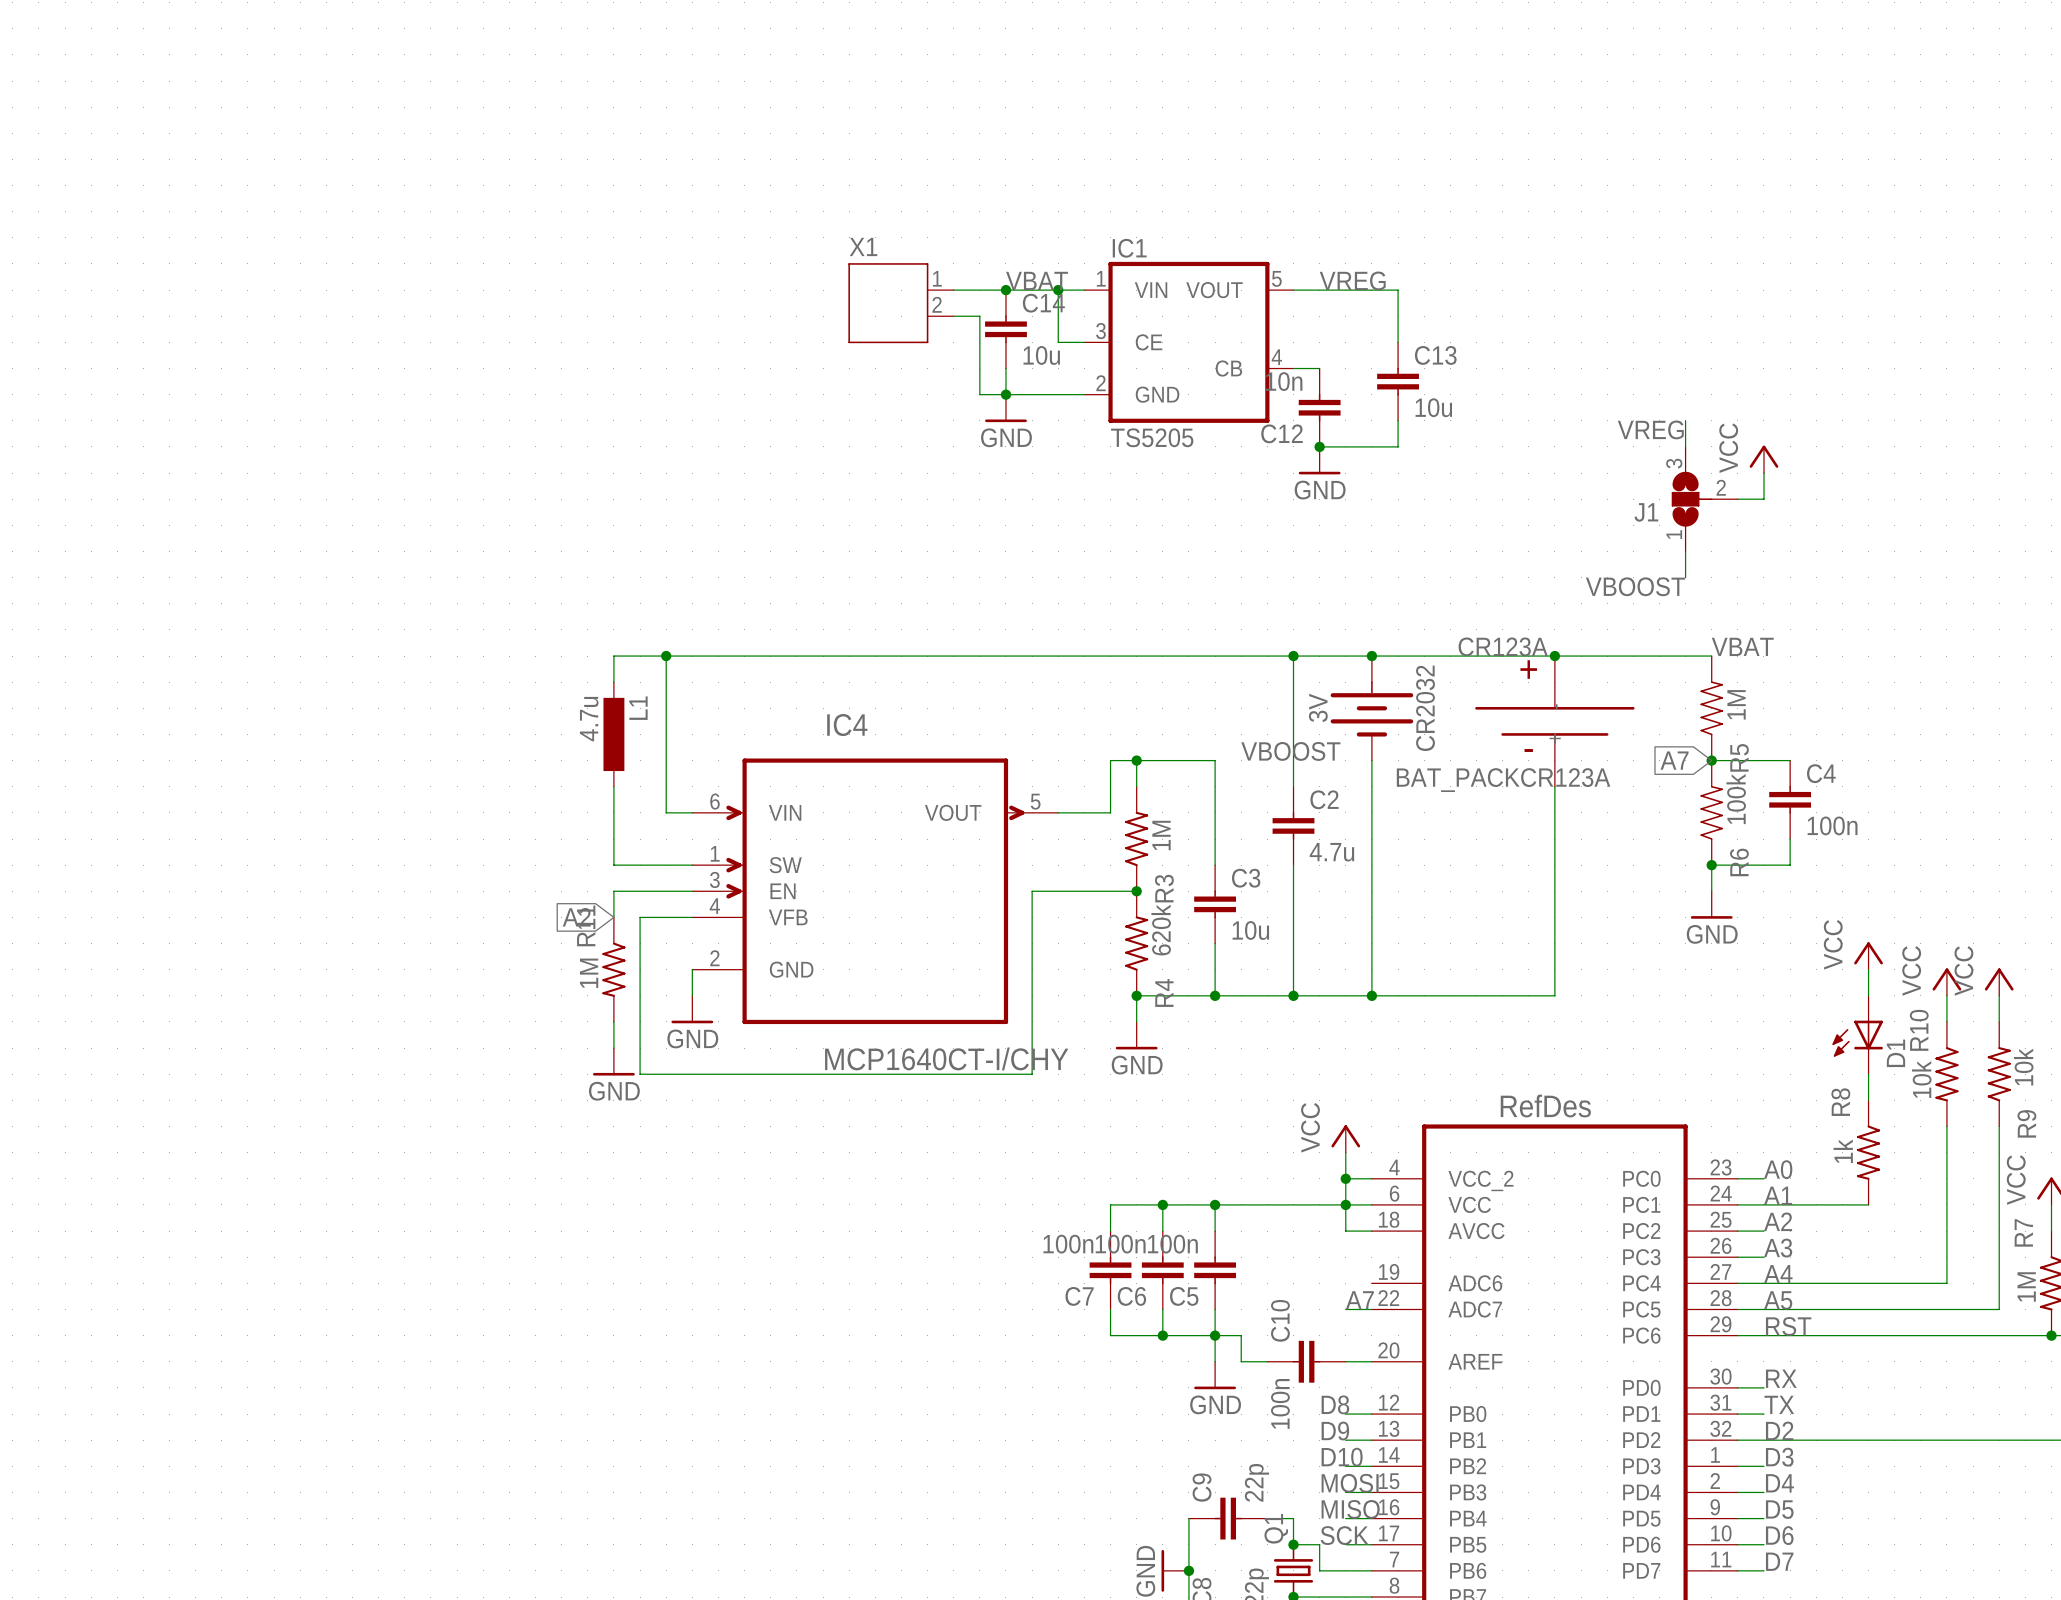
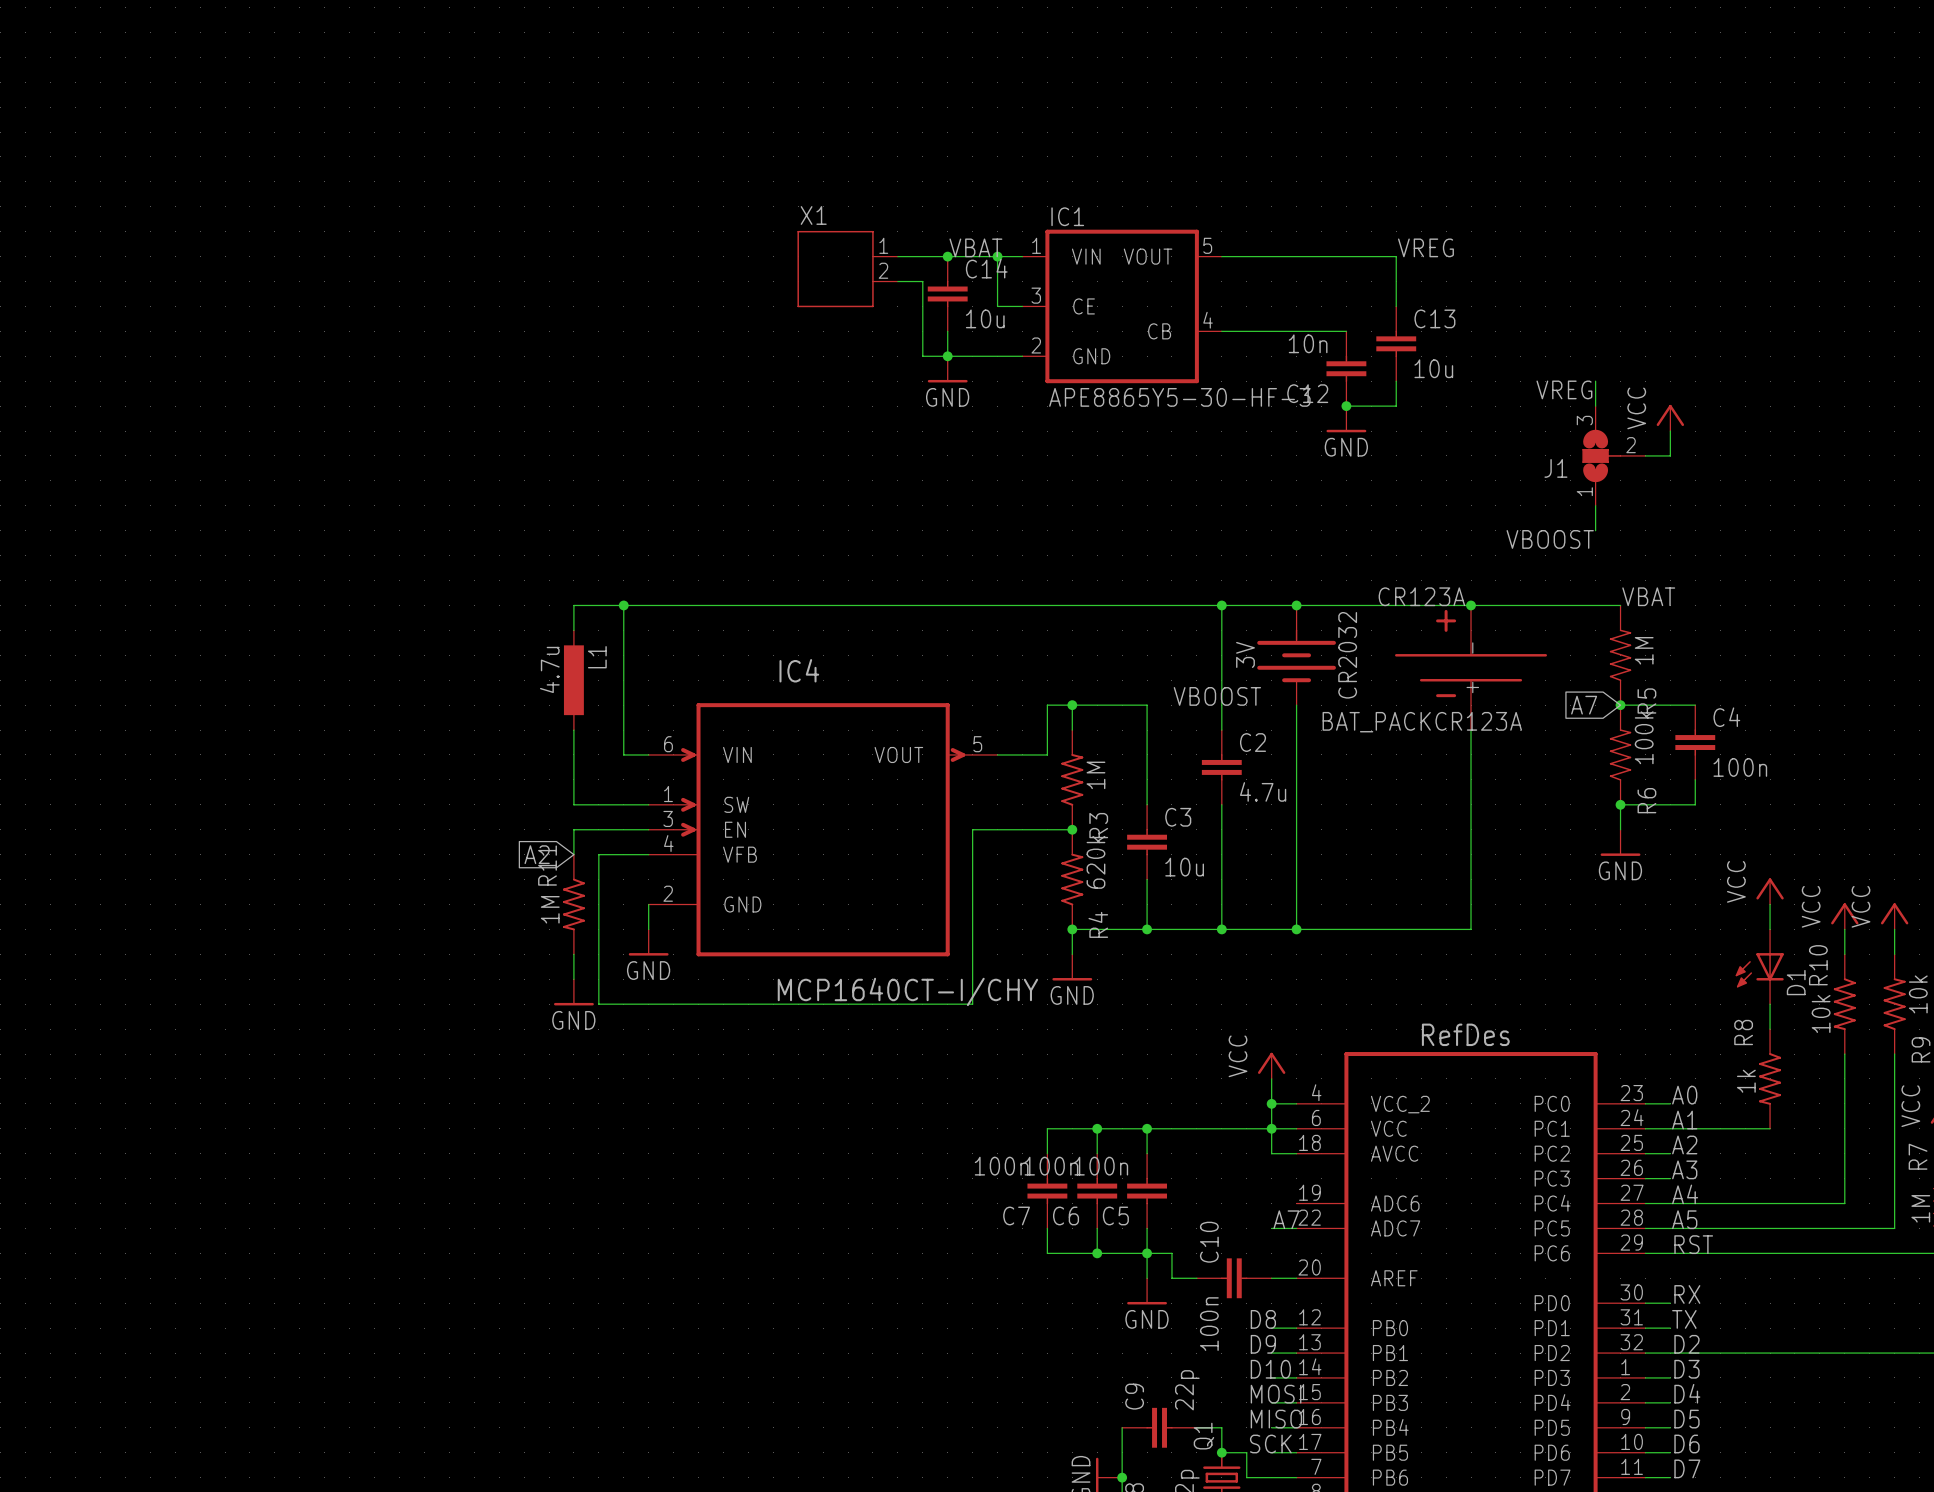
label position: VREG (1352, 280) -> VREG (1425, 247)
wire: (1398, 290) (1398, 342) -> (1321, 256) (1396, 256) (1396, 306)
wire: none -> (1246, 331) (1346, 331)
C13 position: (1398, 381) -> (1396, 343)
C12 position: (1319, 407) -> (1346, 368)
wire: (1398, 420) (1398, 446) (1319, 446) -> none
wire: none -> (1396, 381) (1396, 406) (1346, 406)
IC1 value: TS5205 (1152, 437) -> APE8865Y5-30-HF-3 (1179, 397)
junction: (1319, 446) -> none
junction: none -> (1346, 406)
power symbol position: GND (1319, 460) -> GND (1346, 419)

